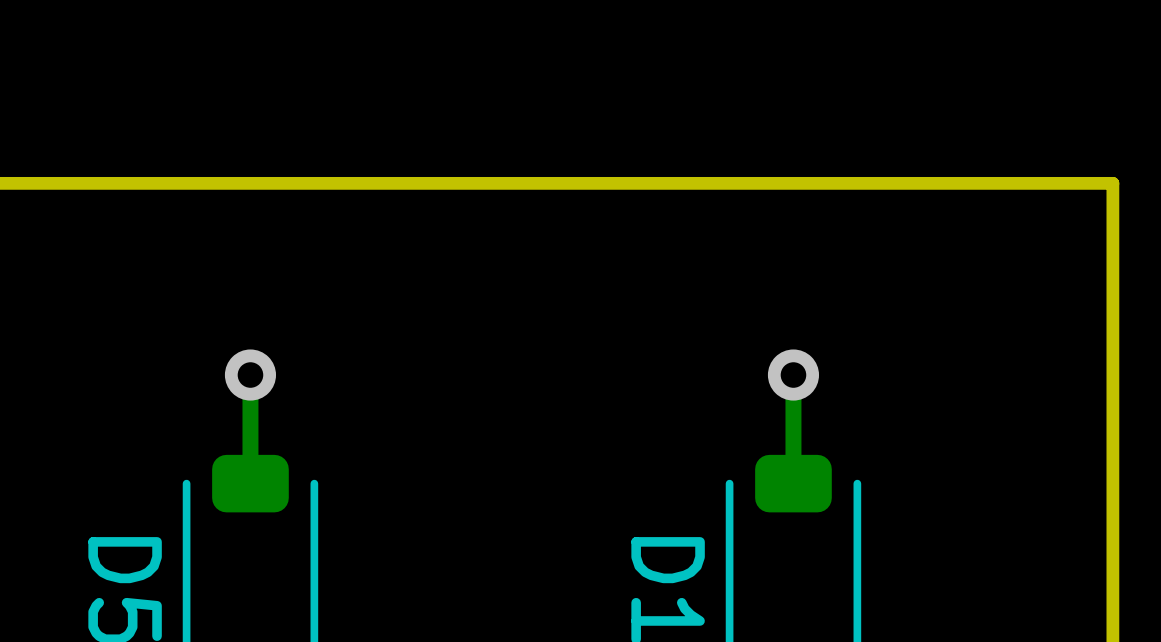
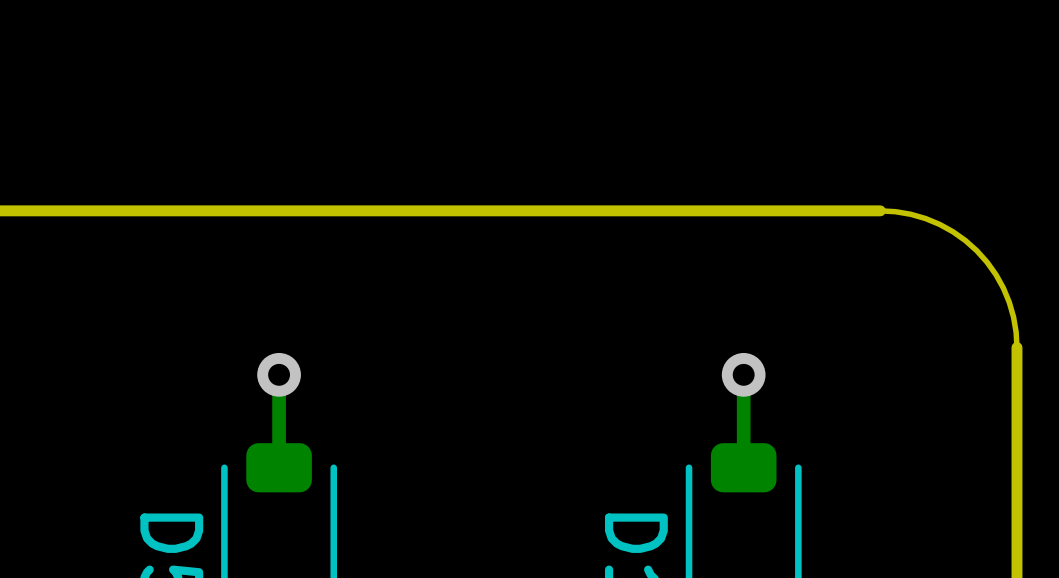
board edge: (953, 183) (1112, 183) (1112, 343) -> (880, 210) (910, 214) (939, 224) (953, 231) (976, 250) (996, 274) (1009, 302) (1013, 317) (1016, 347)

